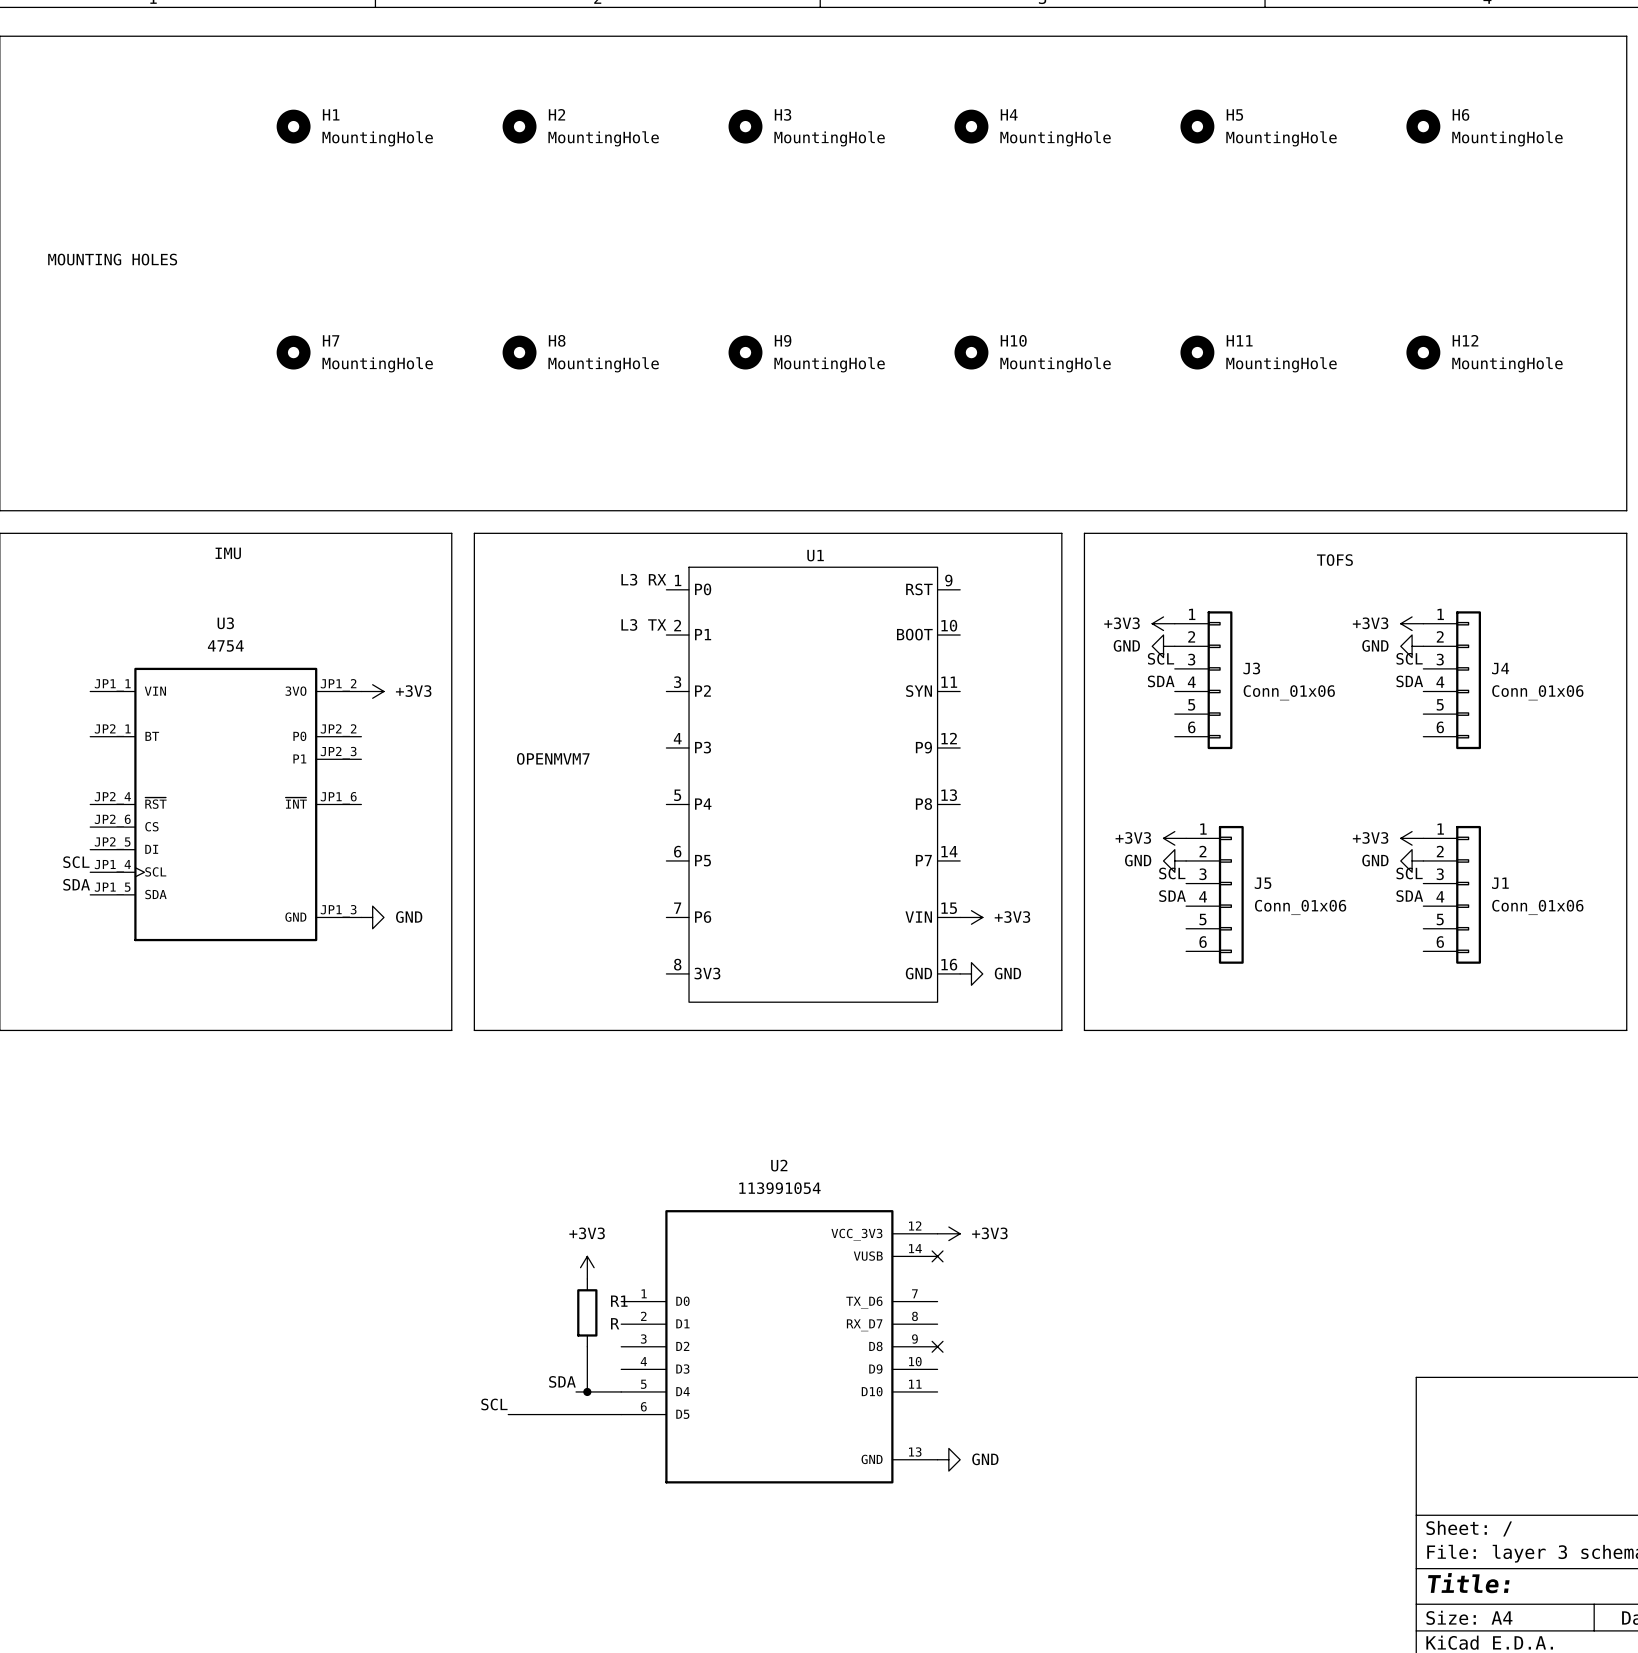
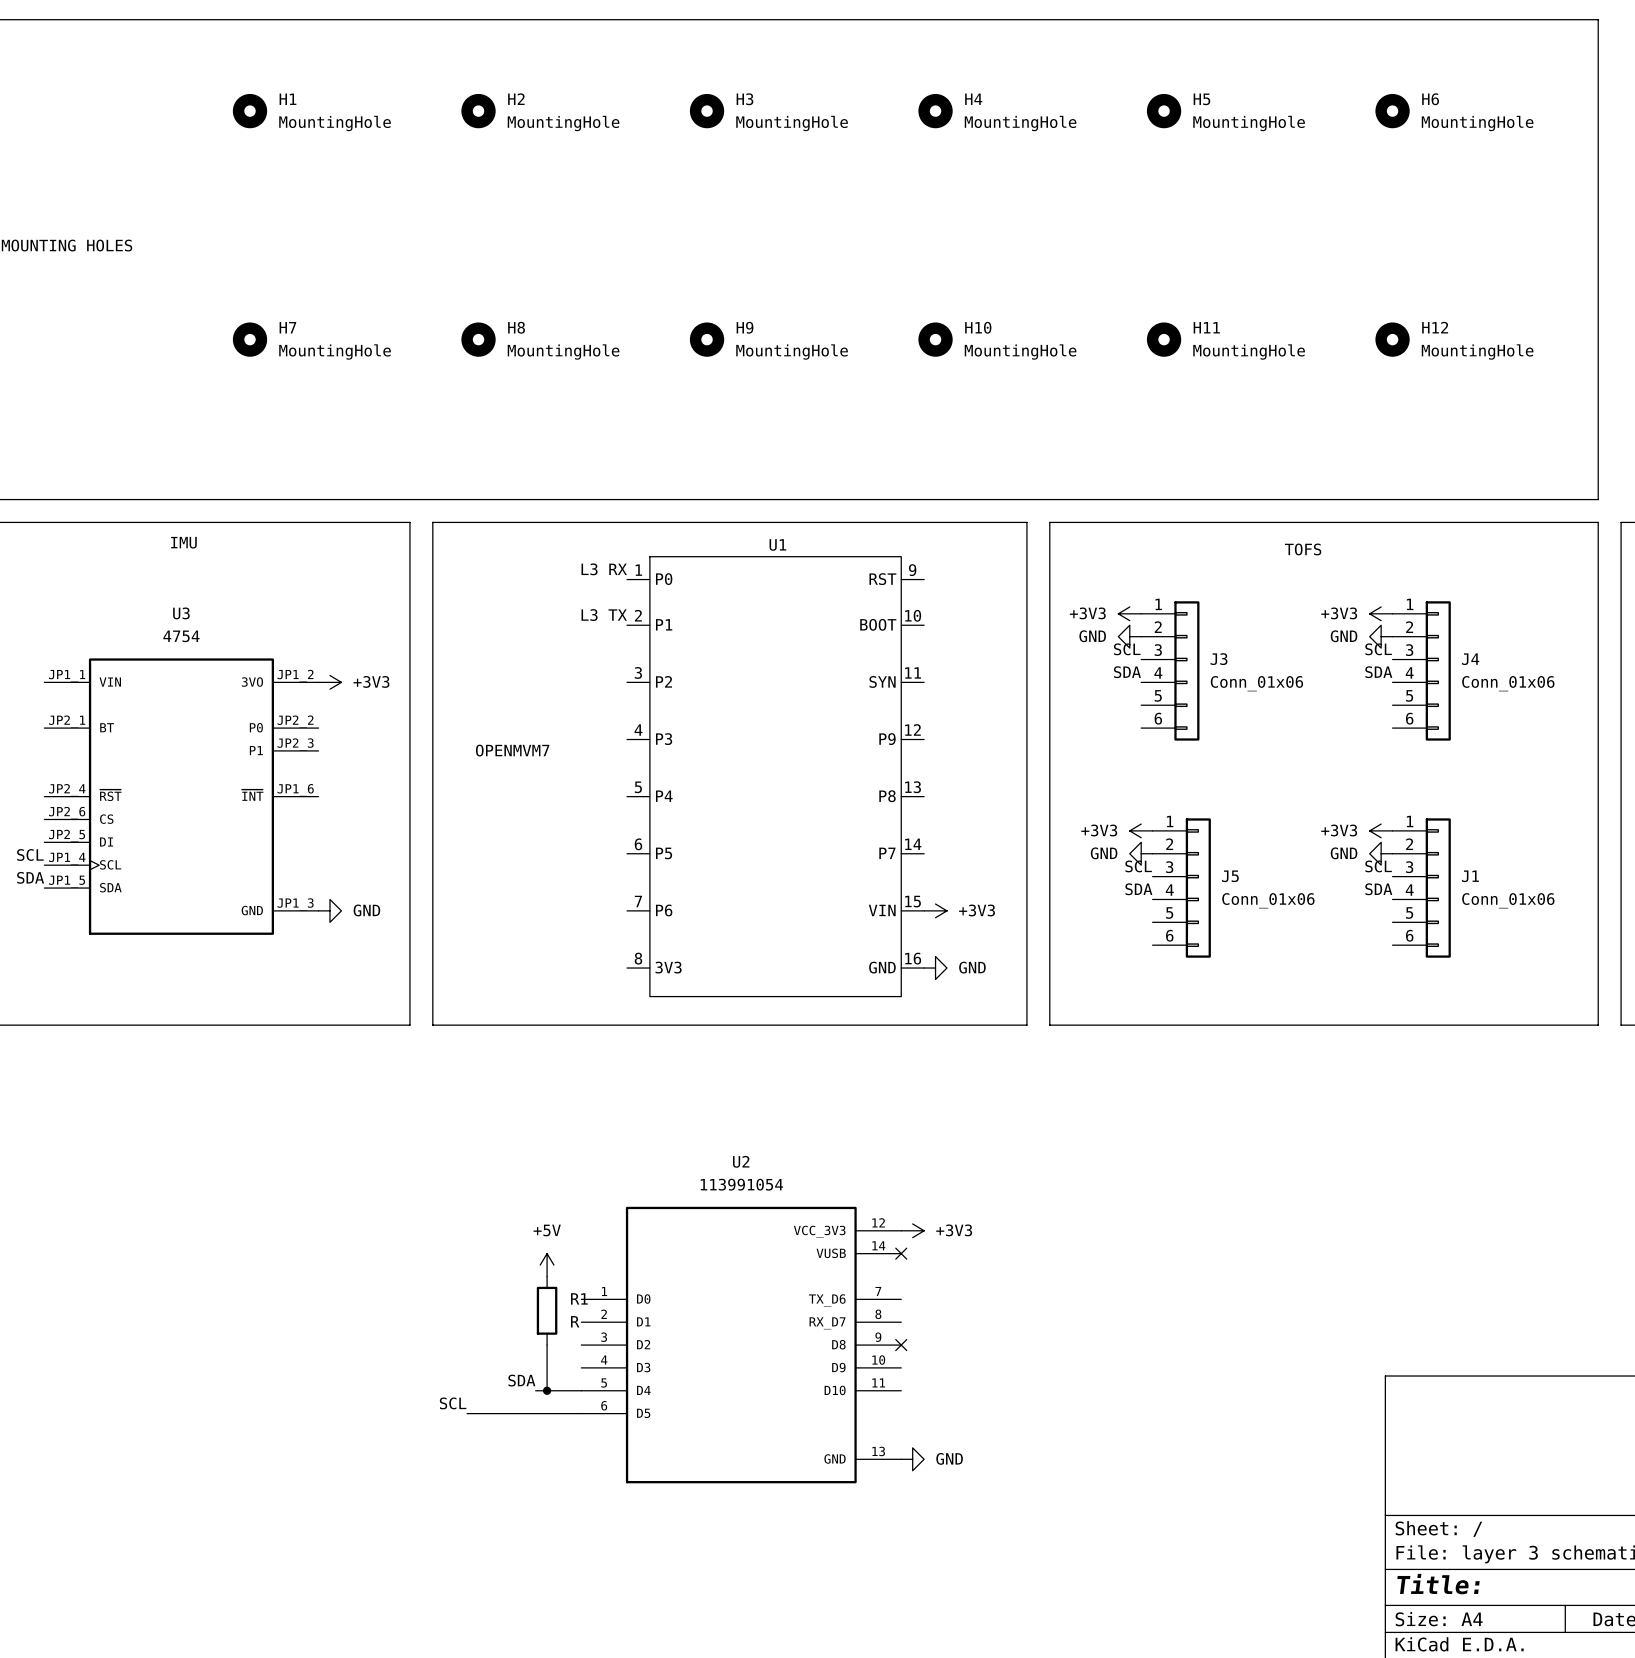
power symbol: +3V3 (587, 1267) -> +5V (547, 1265)

